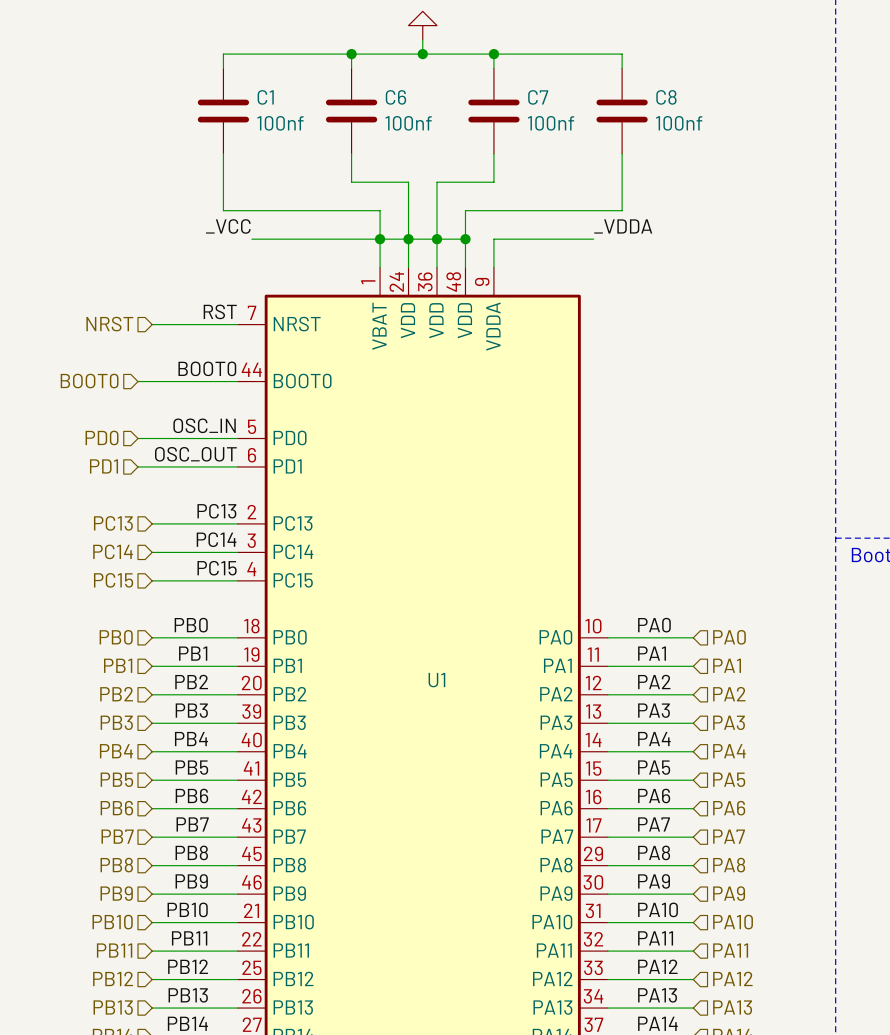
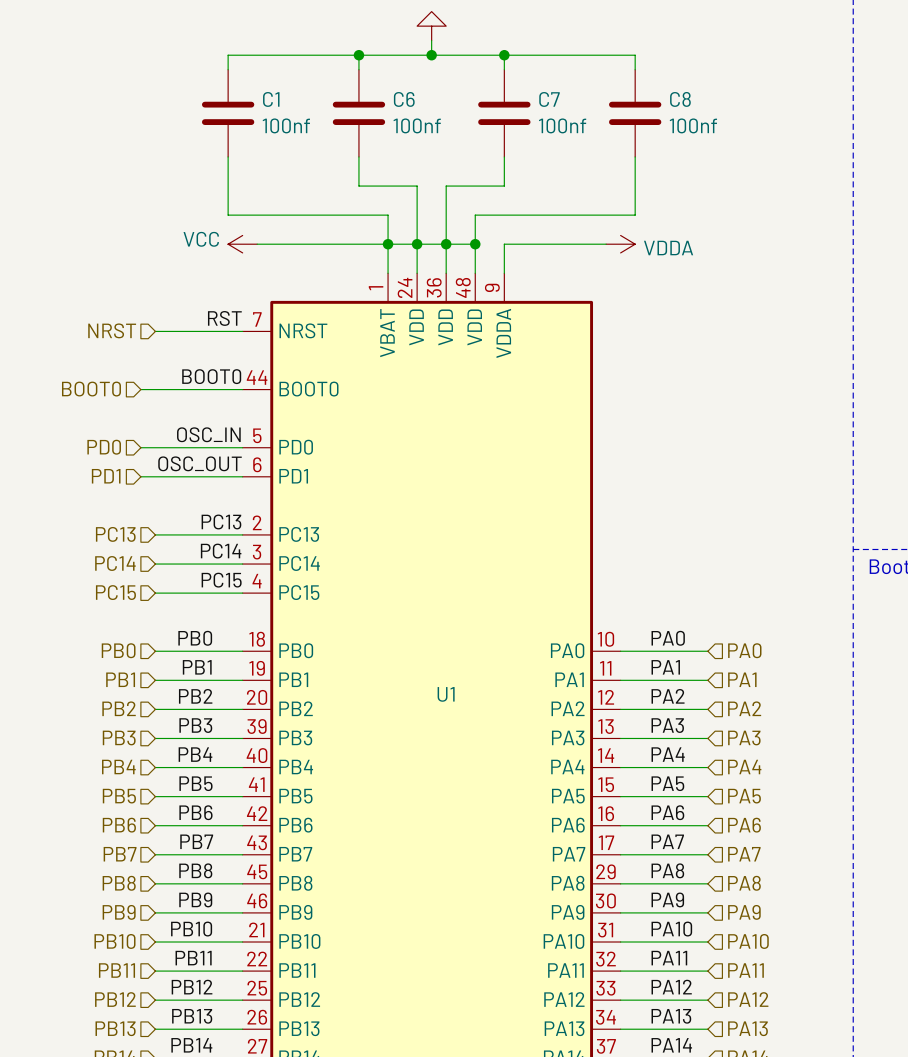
label: _VCC (228, 226) -> none
label: _VDDA (623, 226) -> none
power symbol: none -> VCC (242, 244)
power symbol: none -> VDDA (620, 244)

